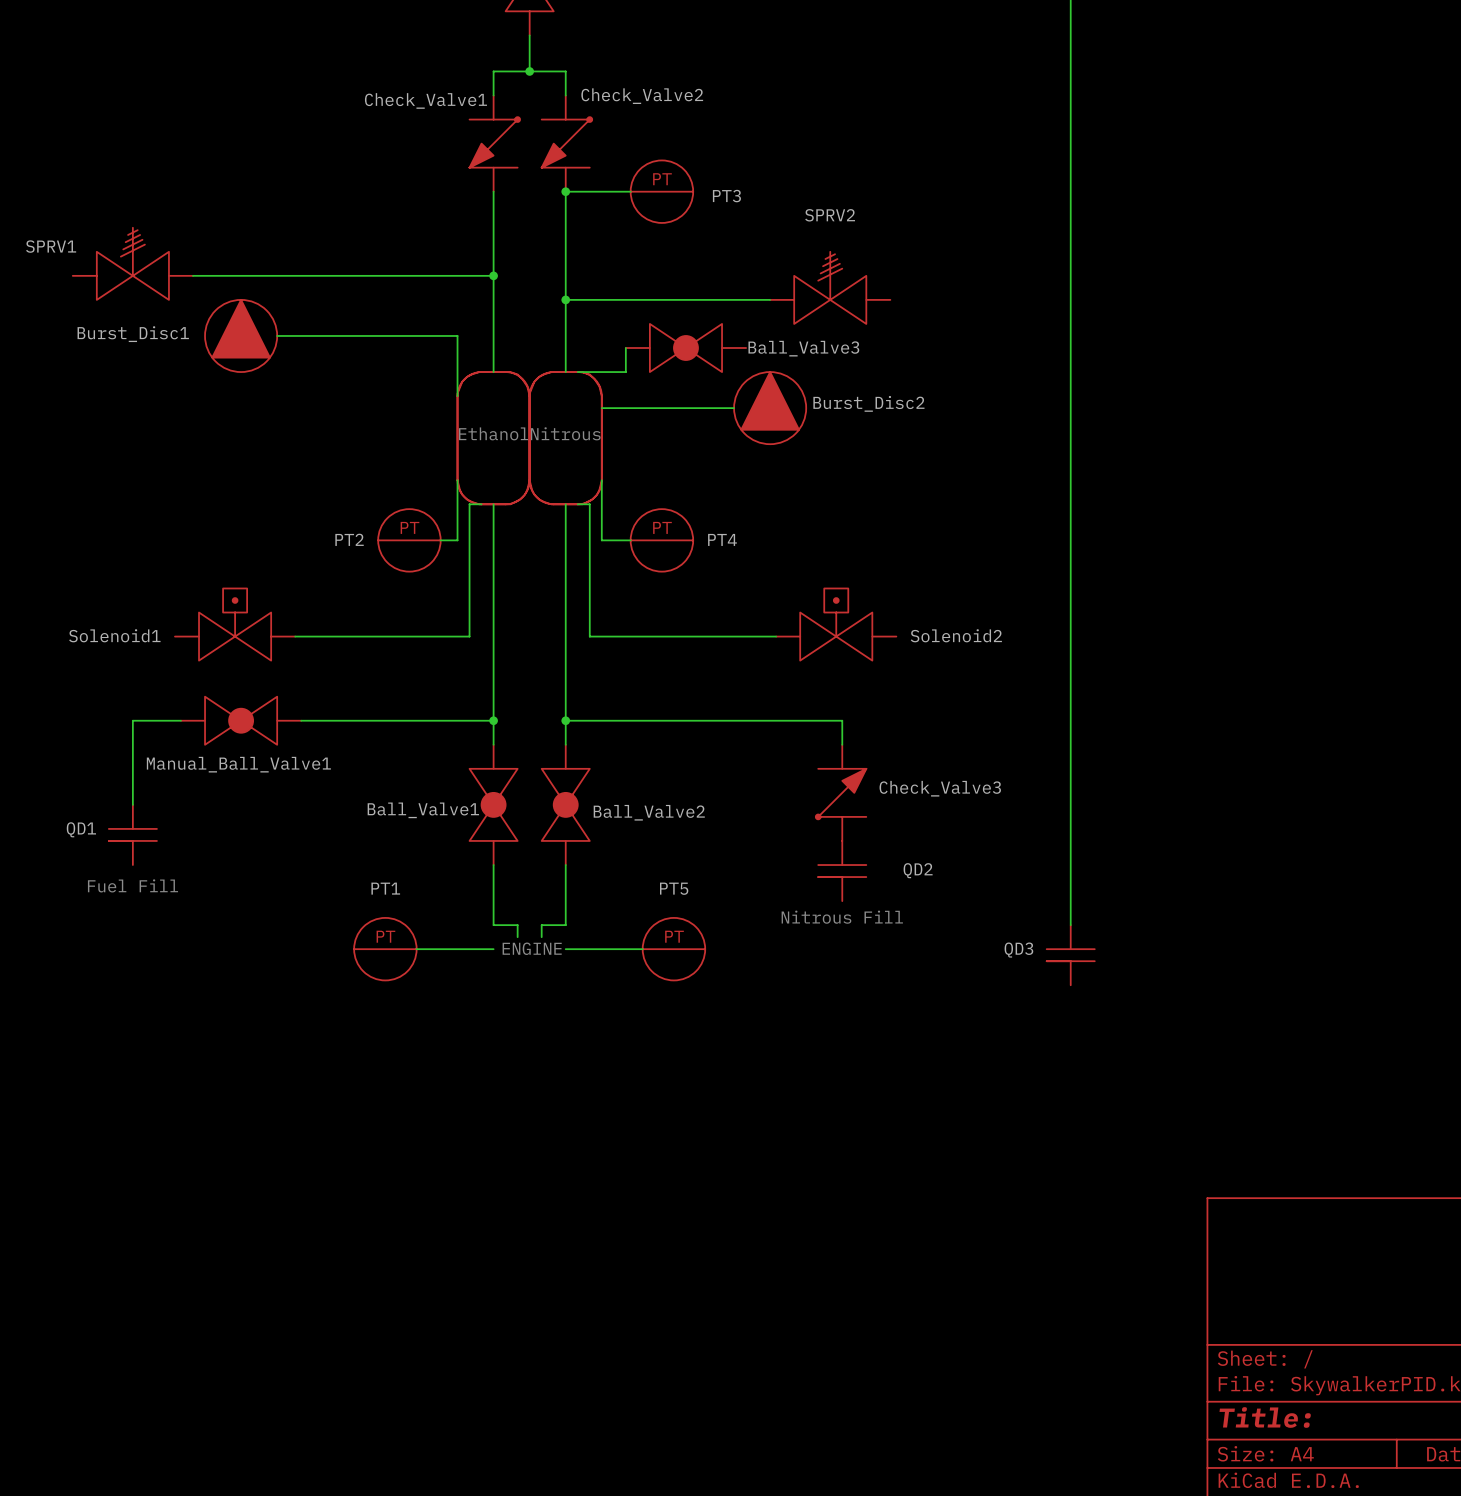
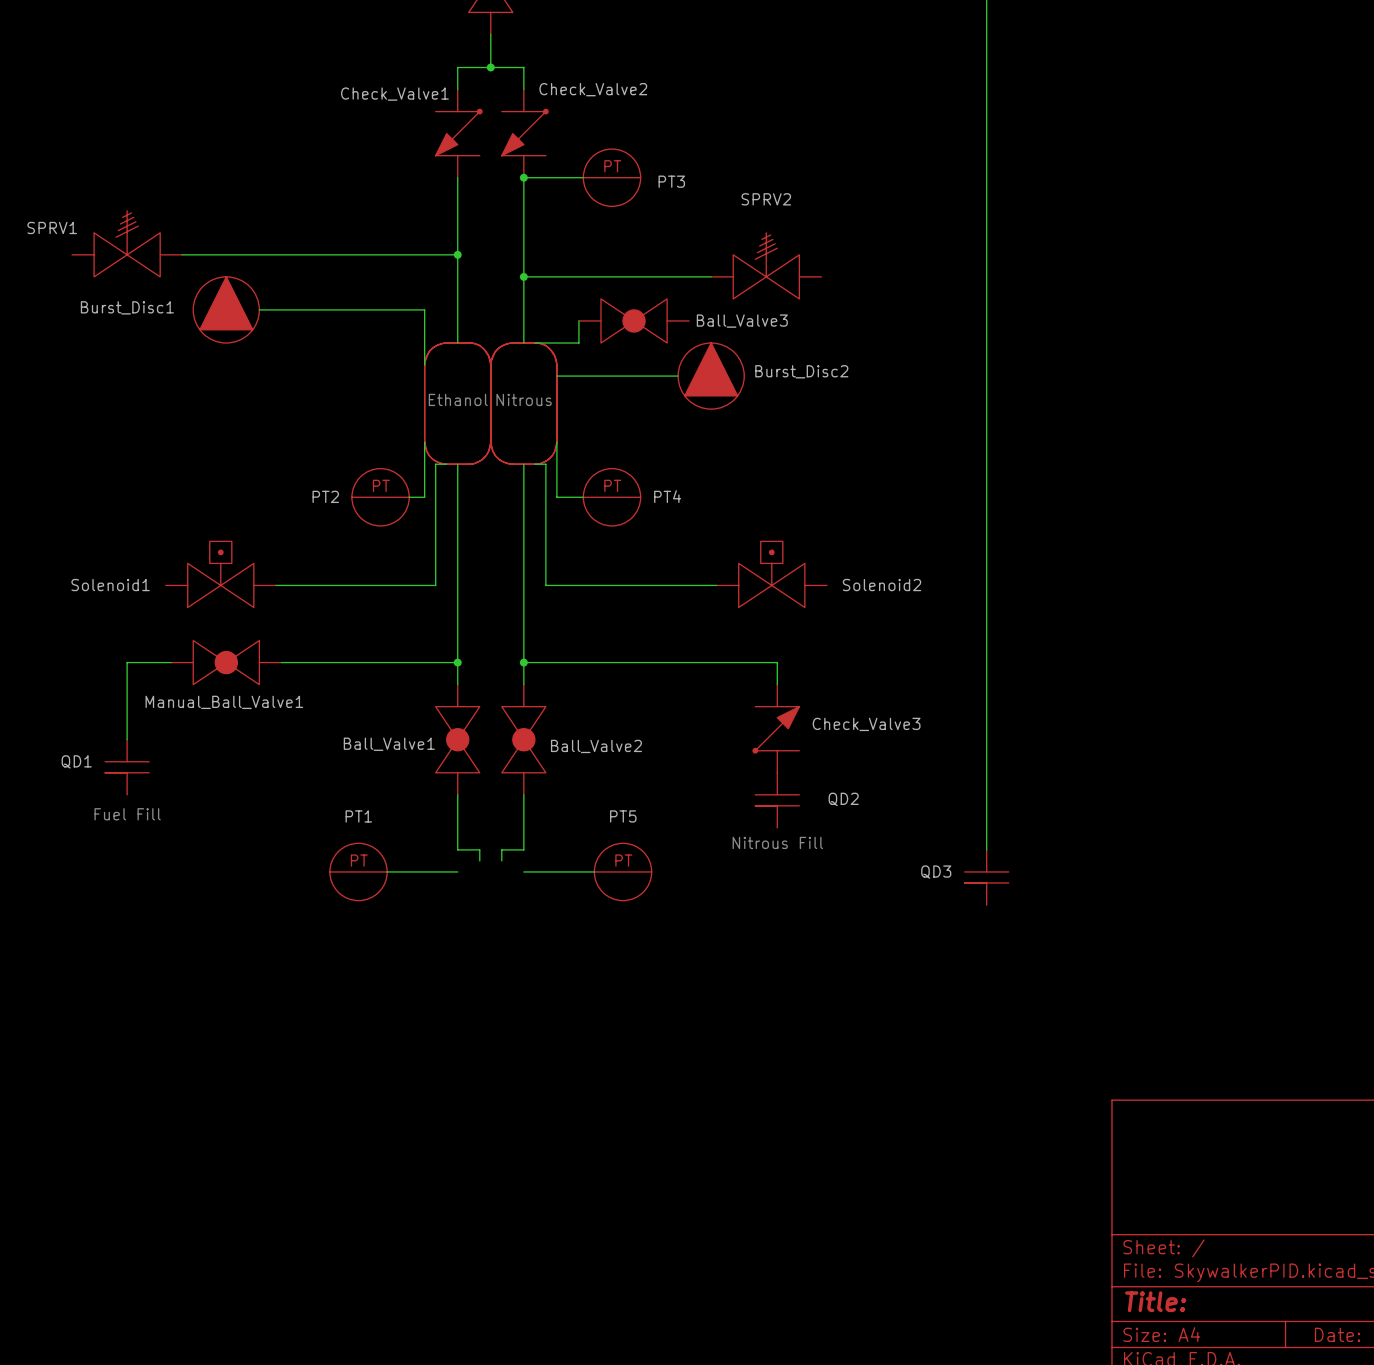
text: ENGINE (532, 948) -> none

